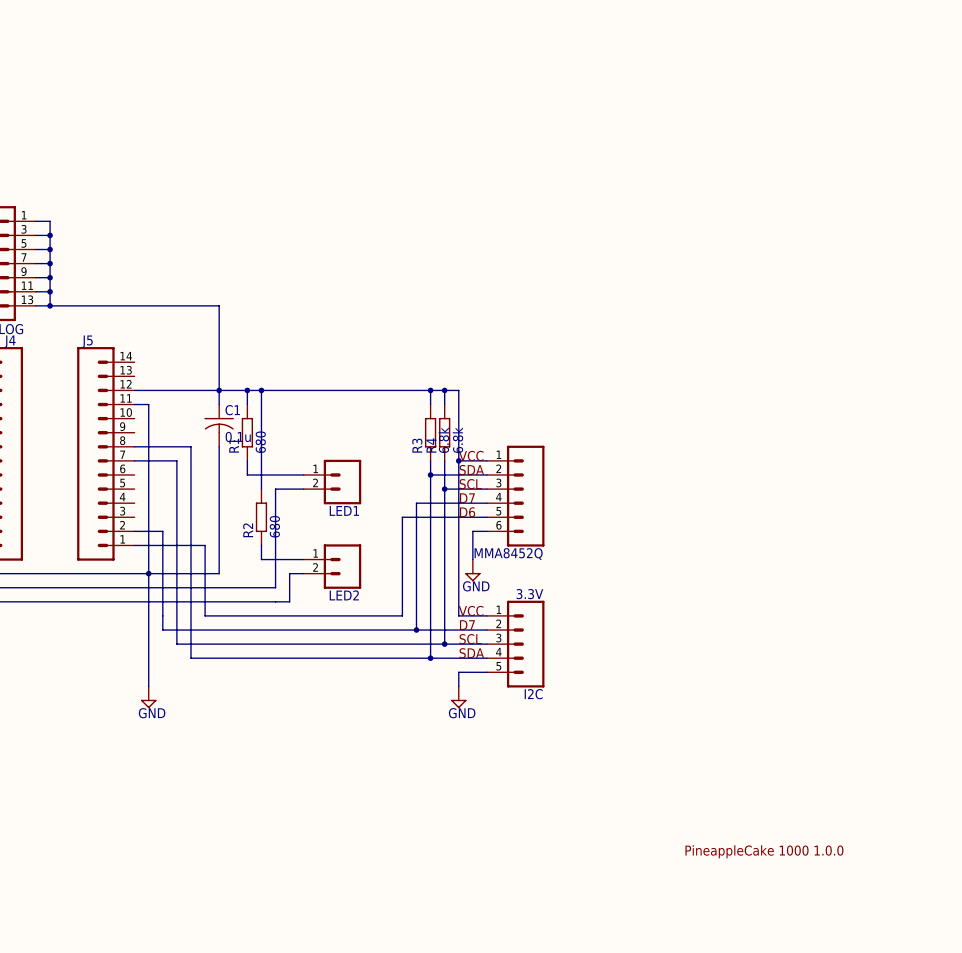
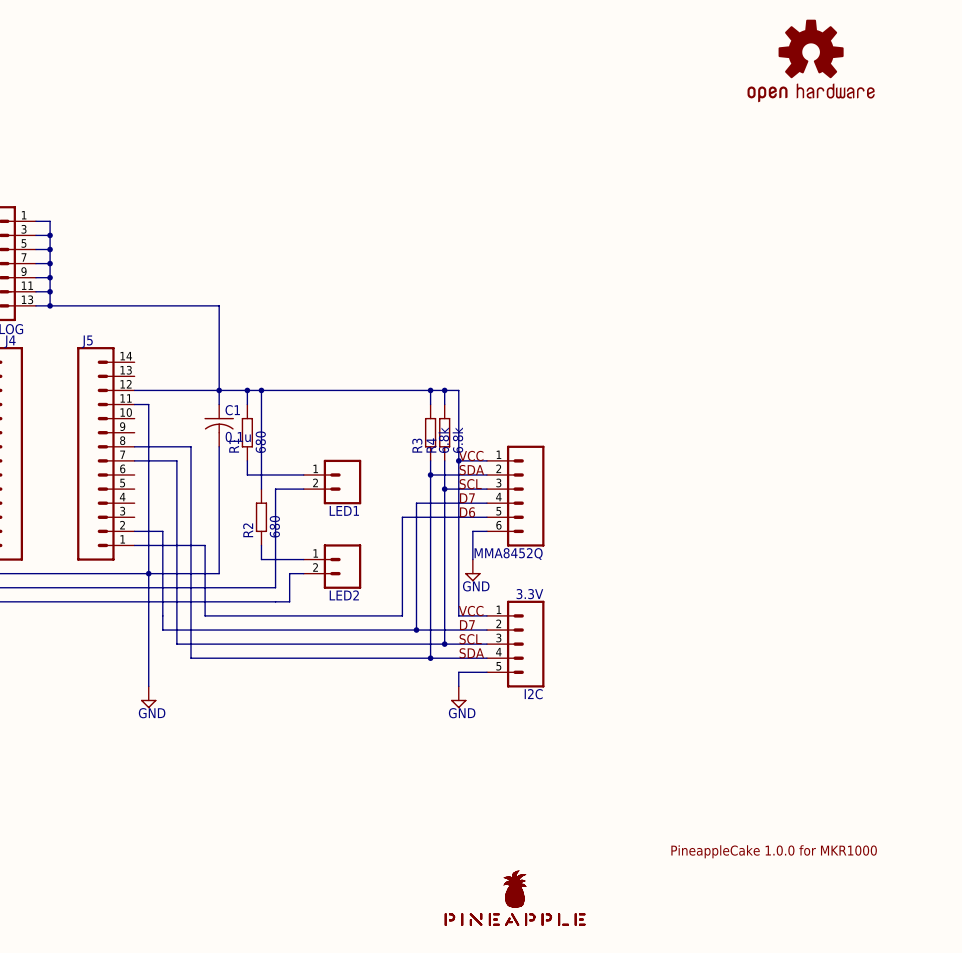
part: none -> (811, 60)
text: PineappleCake 1000 1.0.0 (764, 851) -> PineappleCake 1.0.0 for MKR1000 (774, 851)
part: none -> (515, 898)

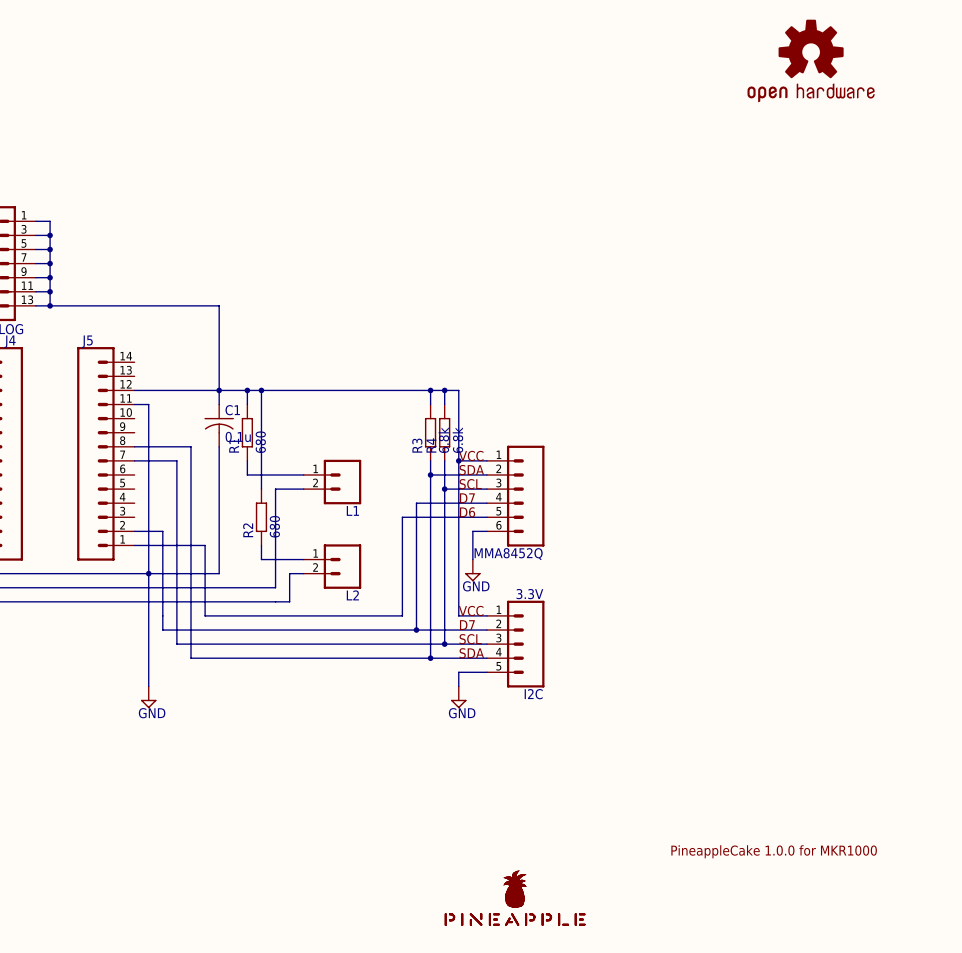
LED1 name: LED1 (344, 510) -> L1 (352, 510)
LED2 name: LED2 (344, 595) -> L2 (352, 595)

